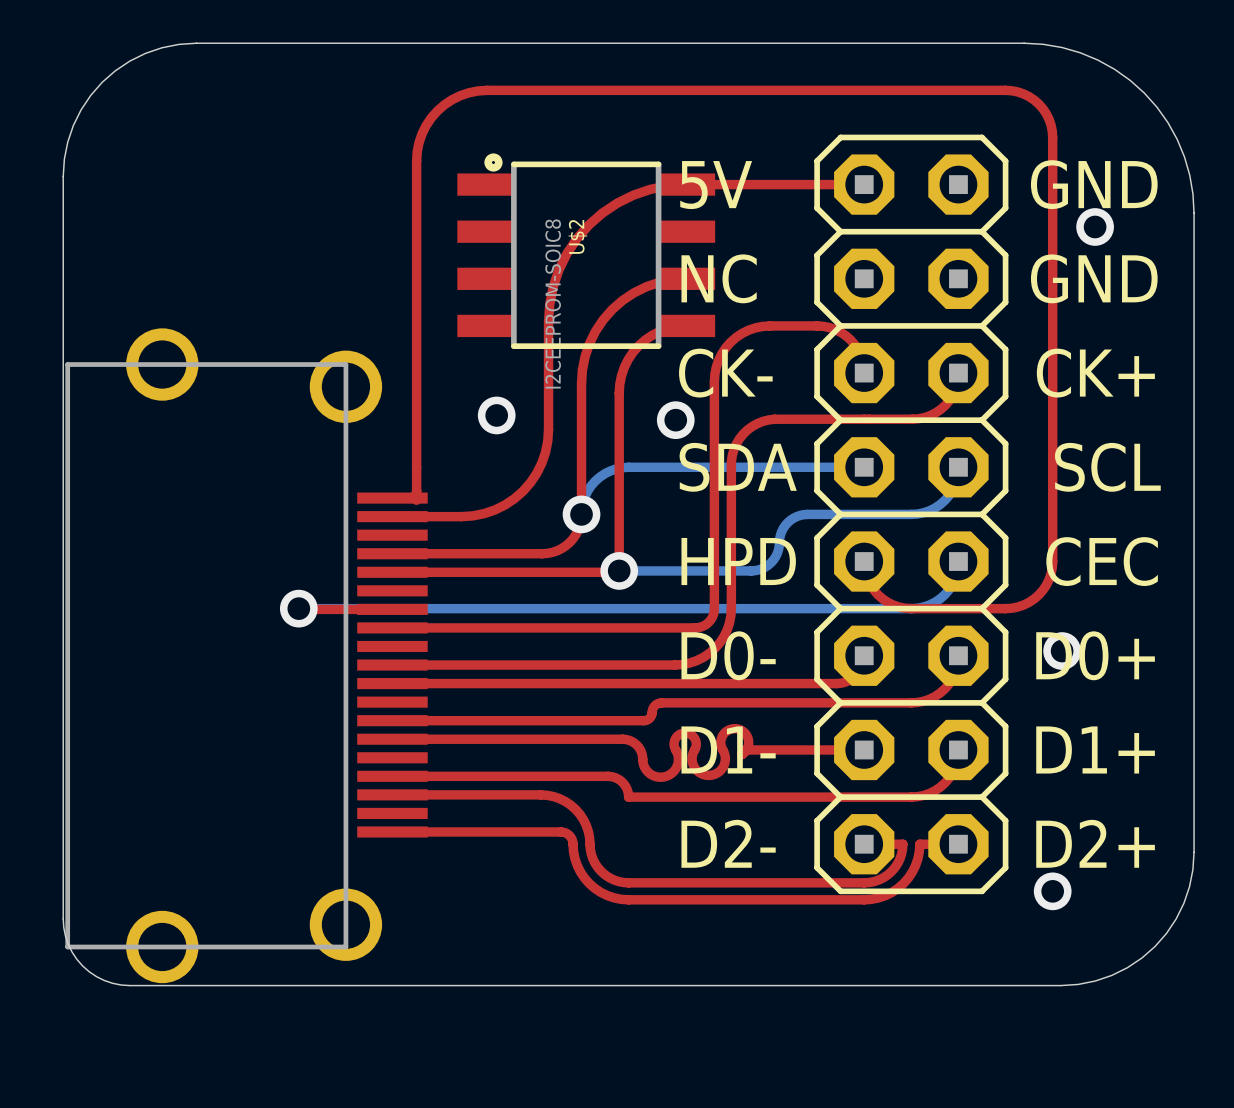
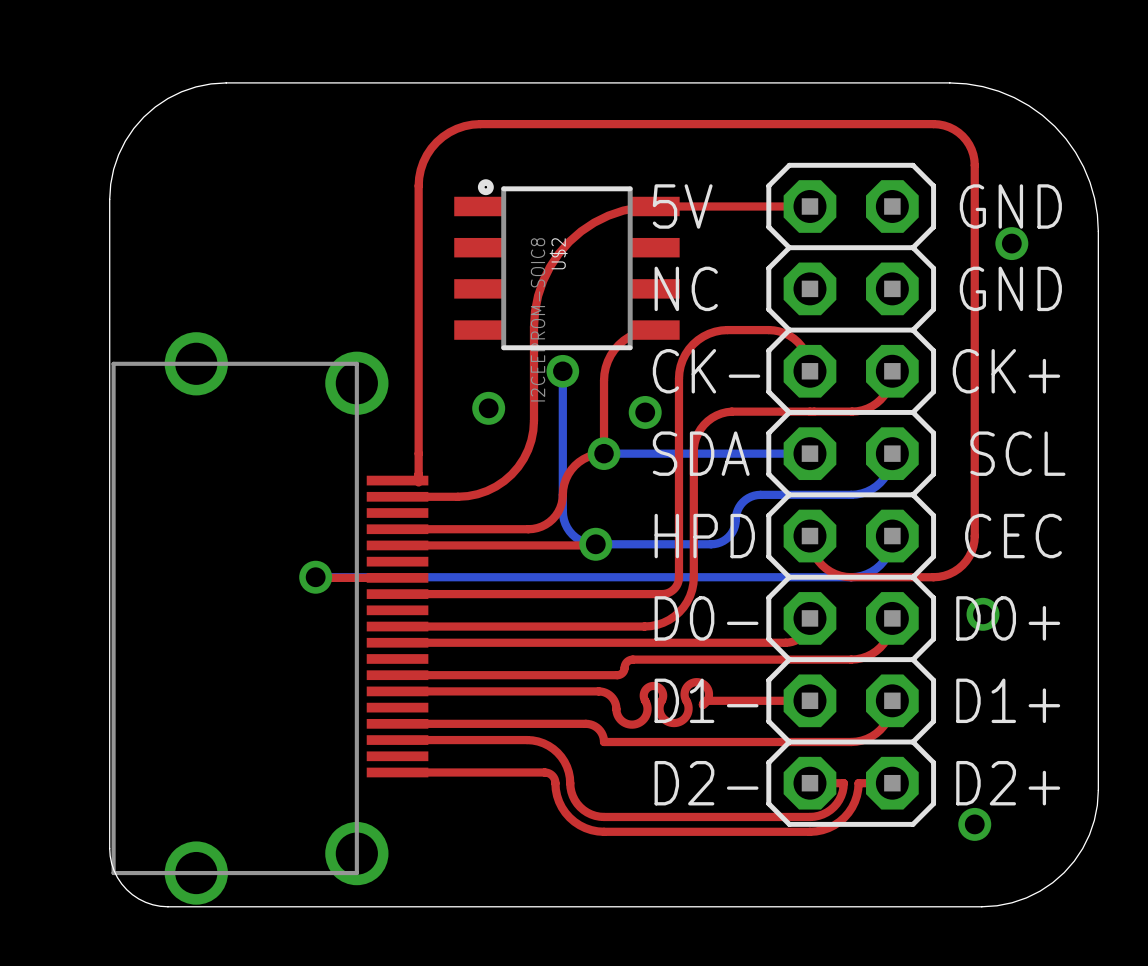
top track: (686, 278) (659, 282) (646, 286) (622, 300) (603, 319) (589, 343) (585, 356) (581, 383) (581, 514) -> (654, 330) (641, 331) (629, 336) (618, 344) (610, 355) (604, 373) (604, 453) (588, 456) (574, 465) (565, 479) (562, 494)
top track: (686, 325) (660, 331) (645, 339) (628, 359) (621, 375) (619, 393) (619, 570) -> none
bottom track: none -> (562, 371) (563, 515) (565, 523) (572, 534) (583, 541) (595, 544)
via: none -> (562, 371)
bottom track: (628, 467) (610, 470) (595, 481) (585, 496) (581, 514) -> none
via: none -> (604, 453)
via: (581, 514) -> none

